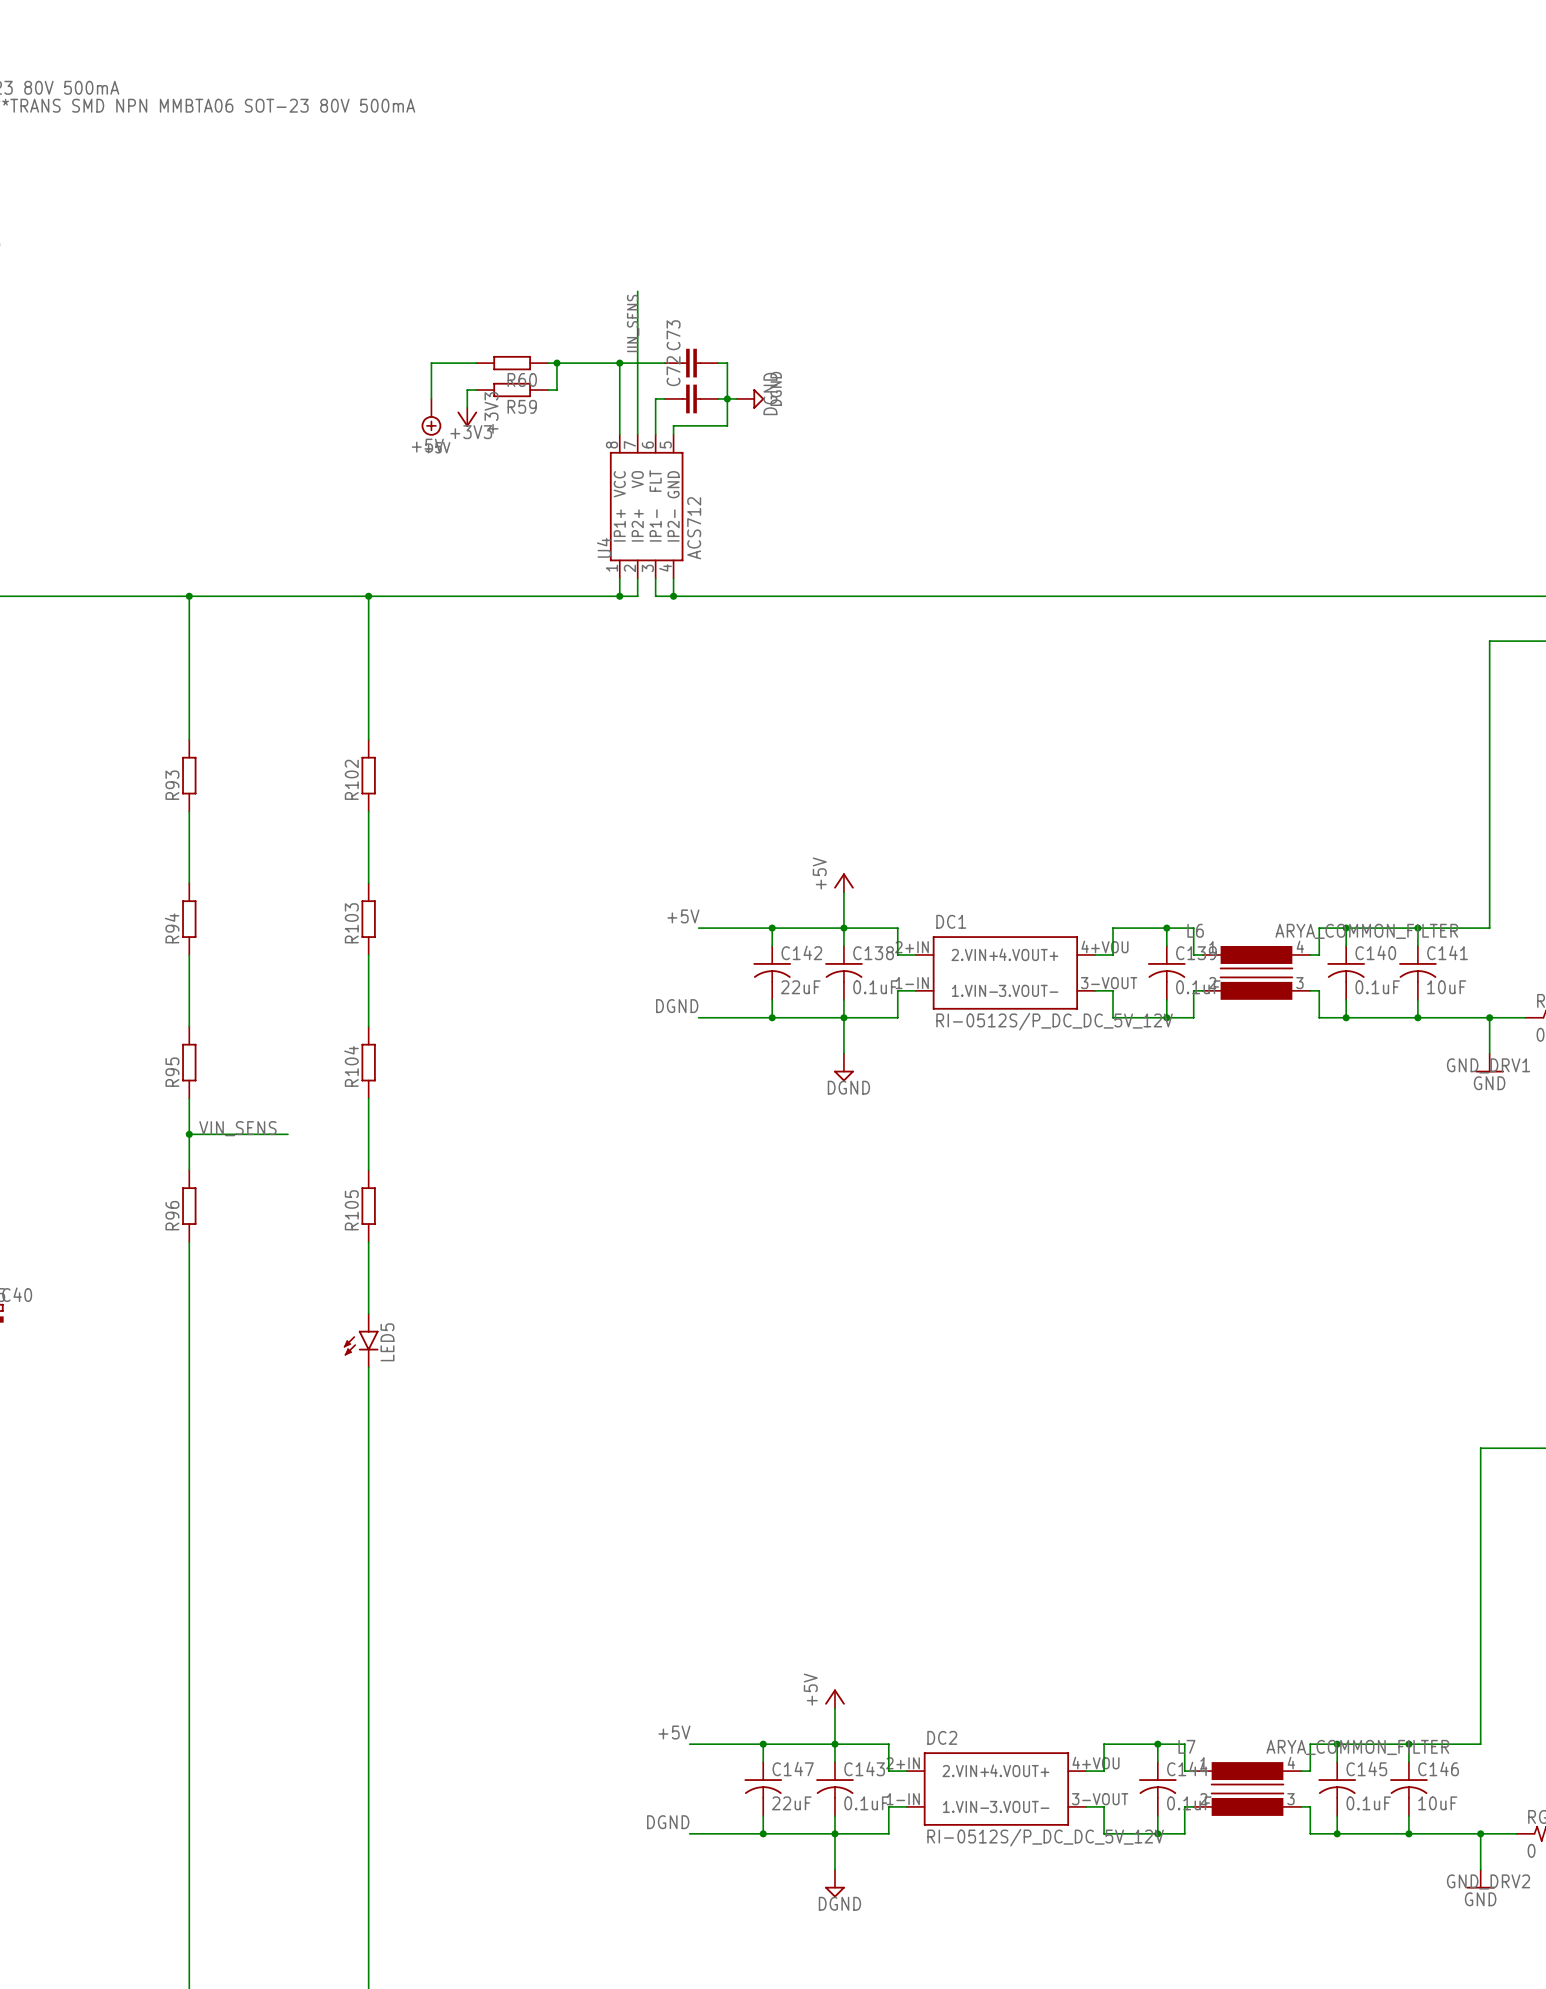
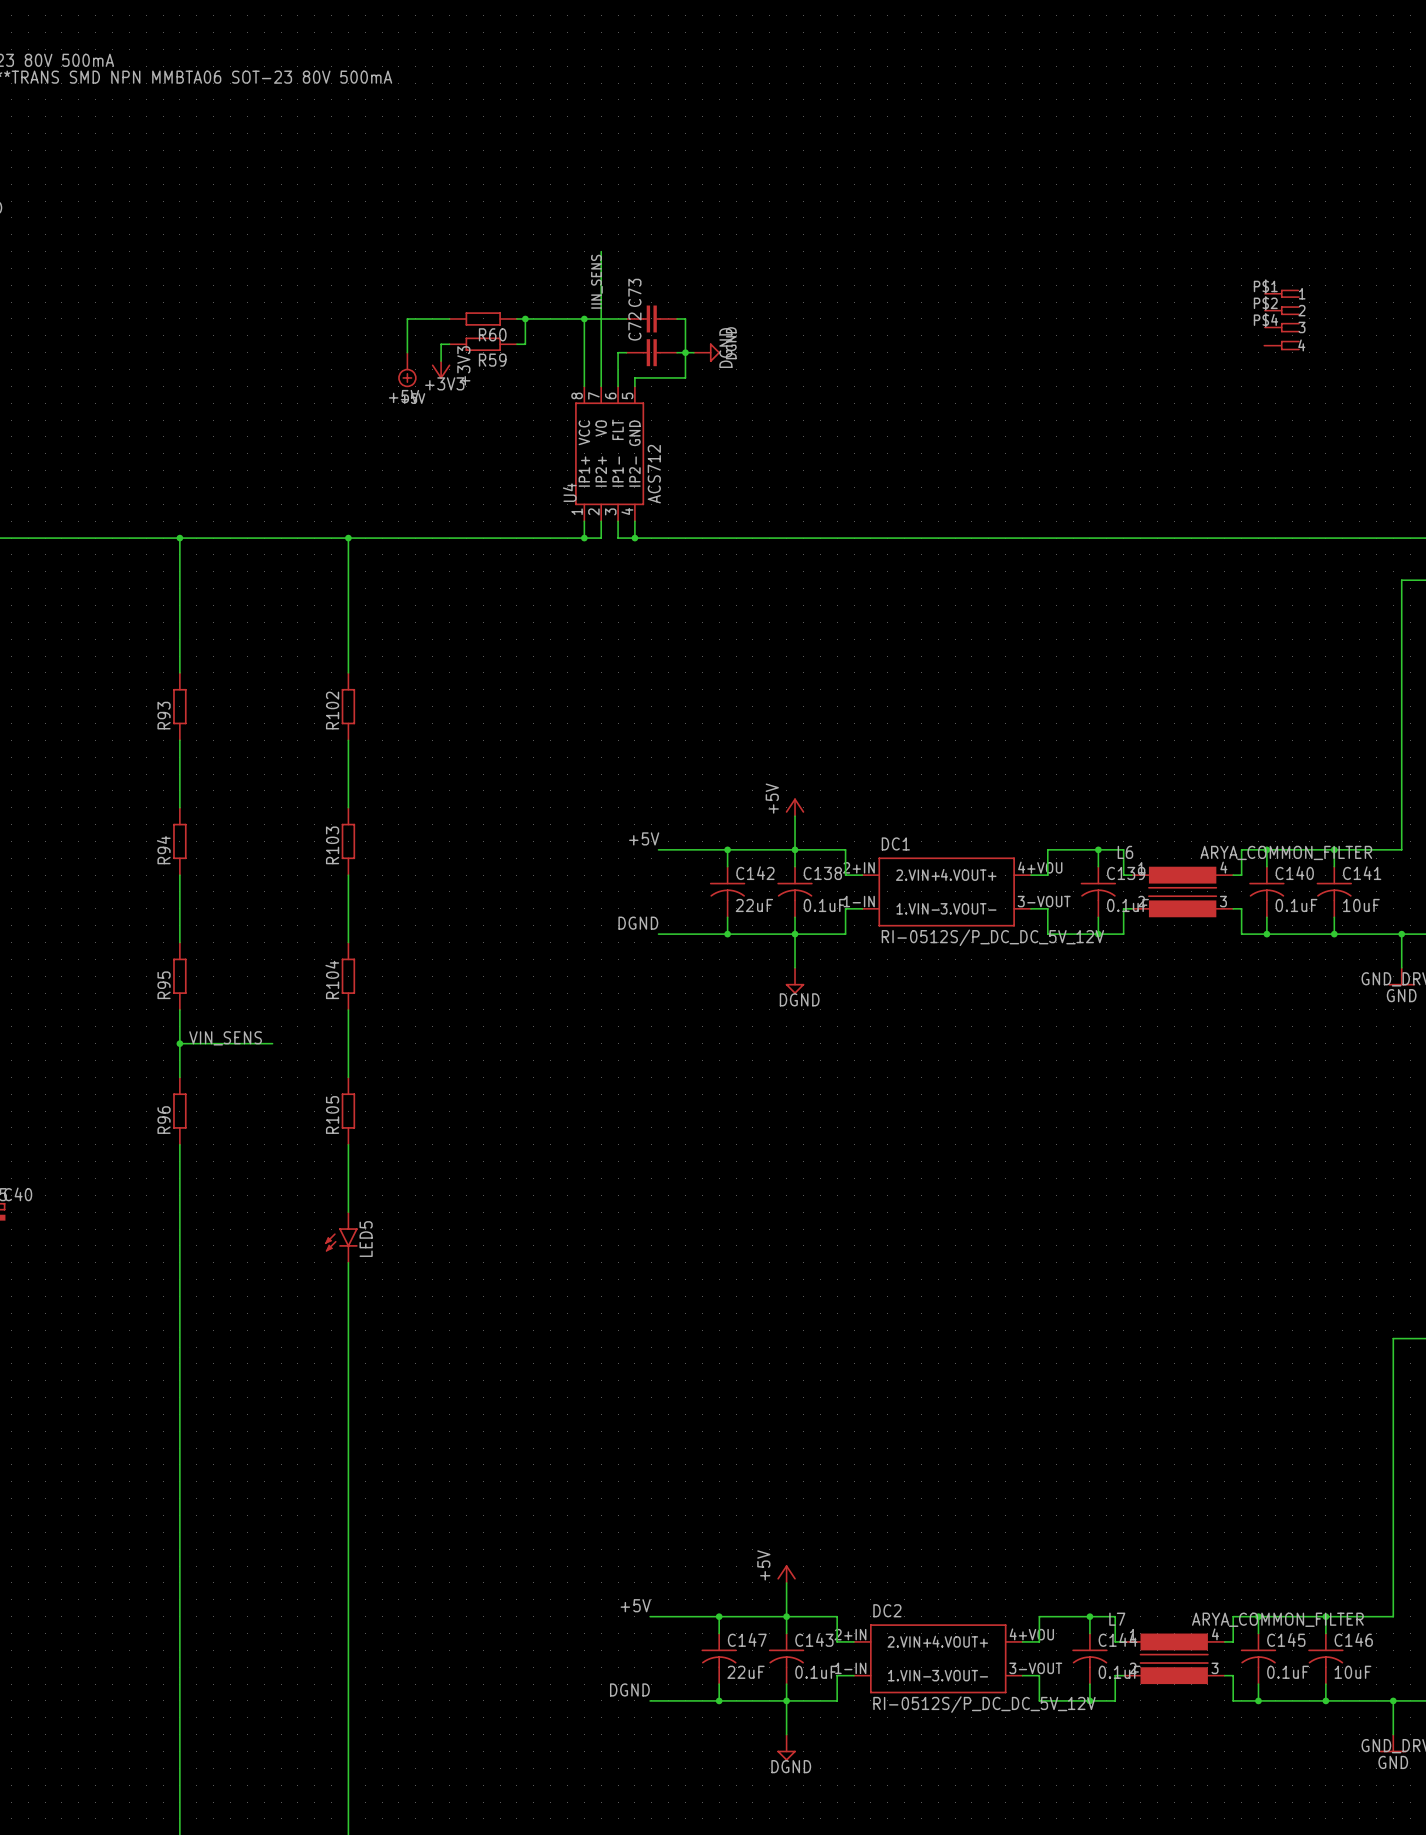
part: none -> (1281, 319)

